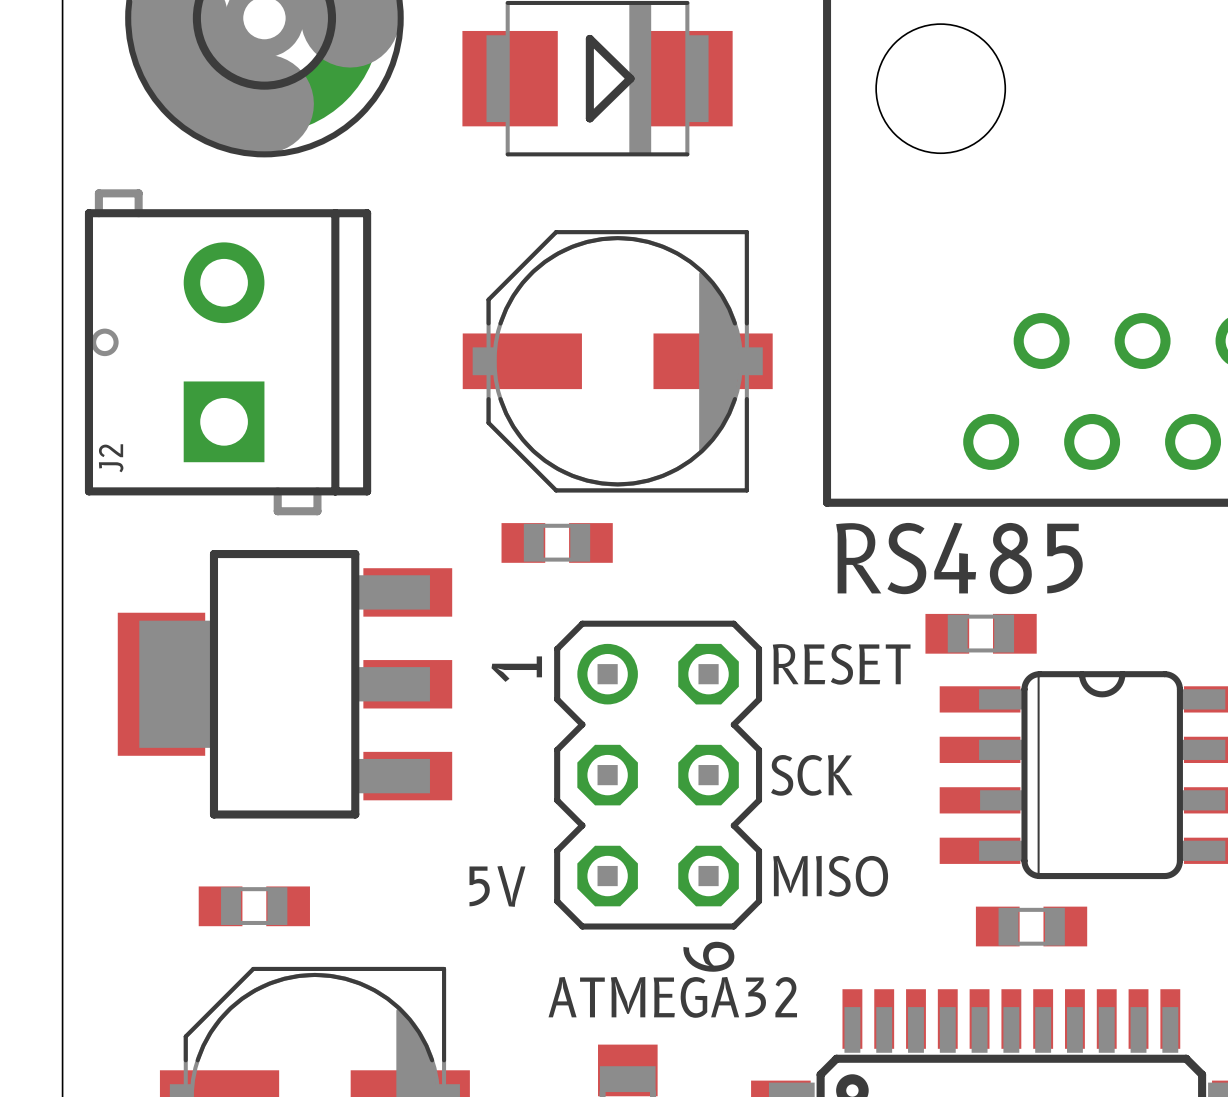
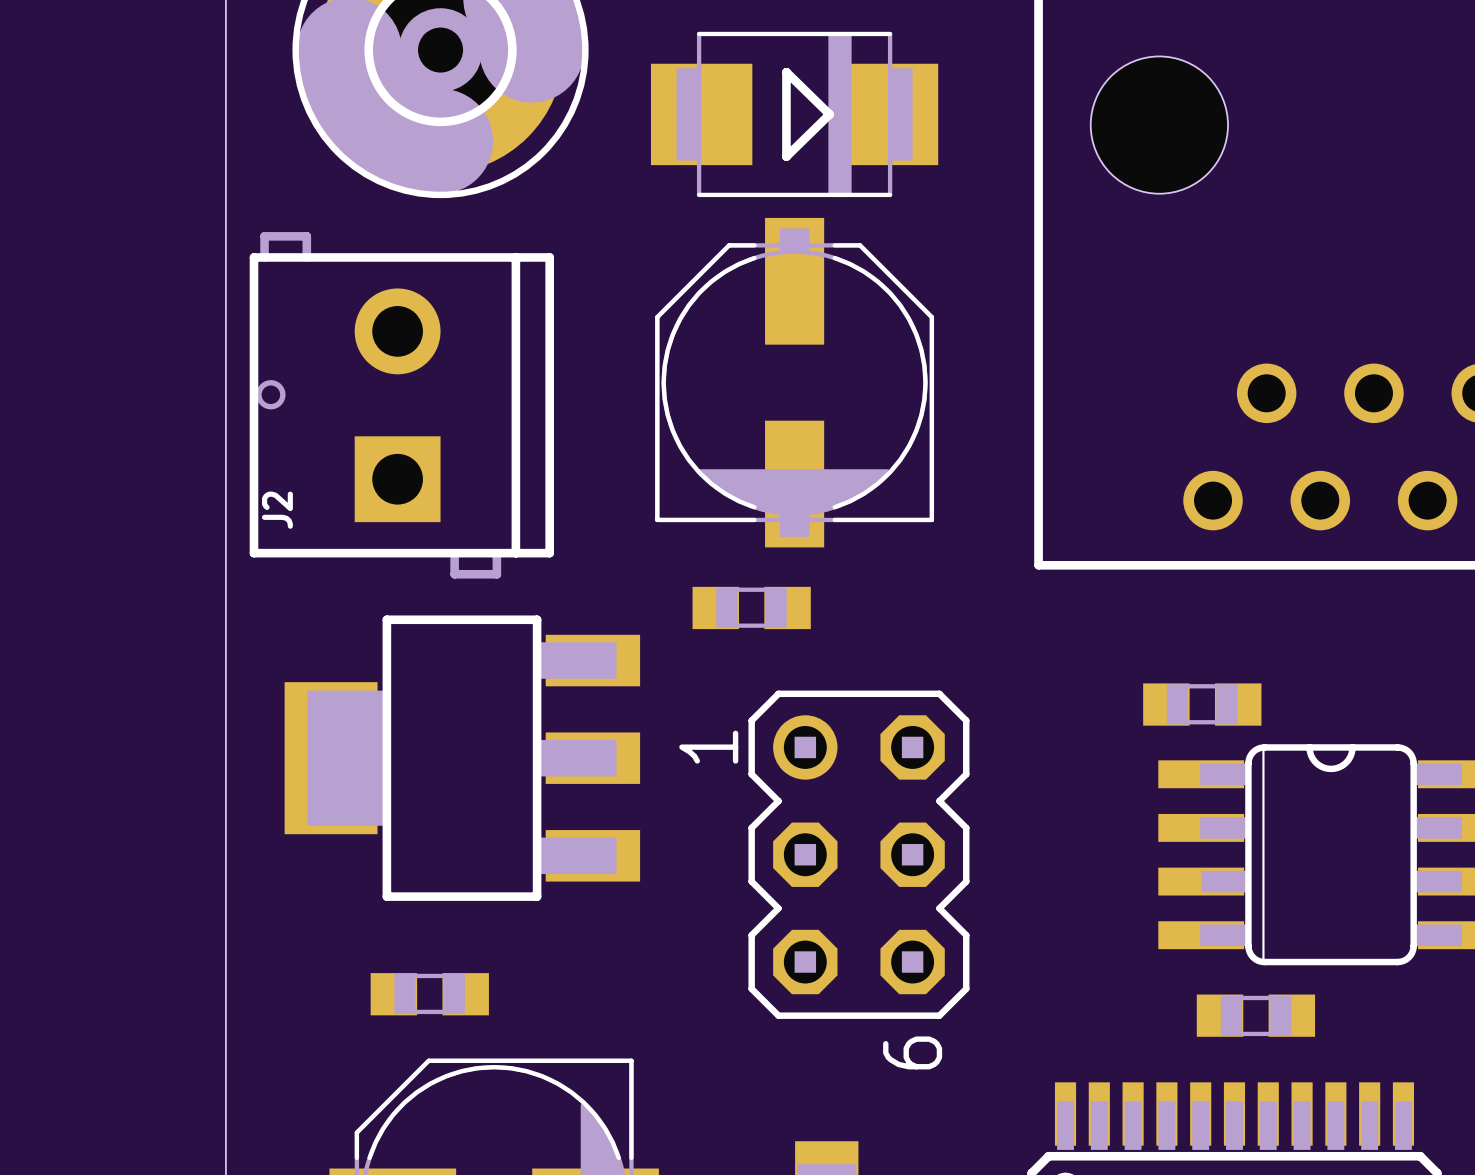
part rotation: 0° (617, 361) -> 90° clockwise (794, 382)
text: RS485 (959, 558) -> none
text: RESET (841, 664) -> none
text: SCK (811, 775) -> none
text: MISO (830, 876) -> none
text: 5V (497, 886) -> none
text: ATMEGA32 (672, 997) -> none

